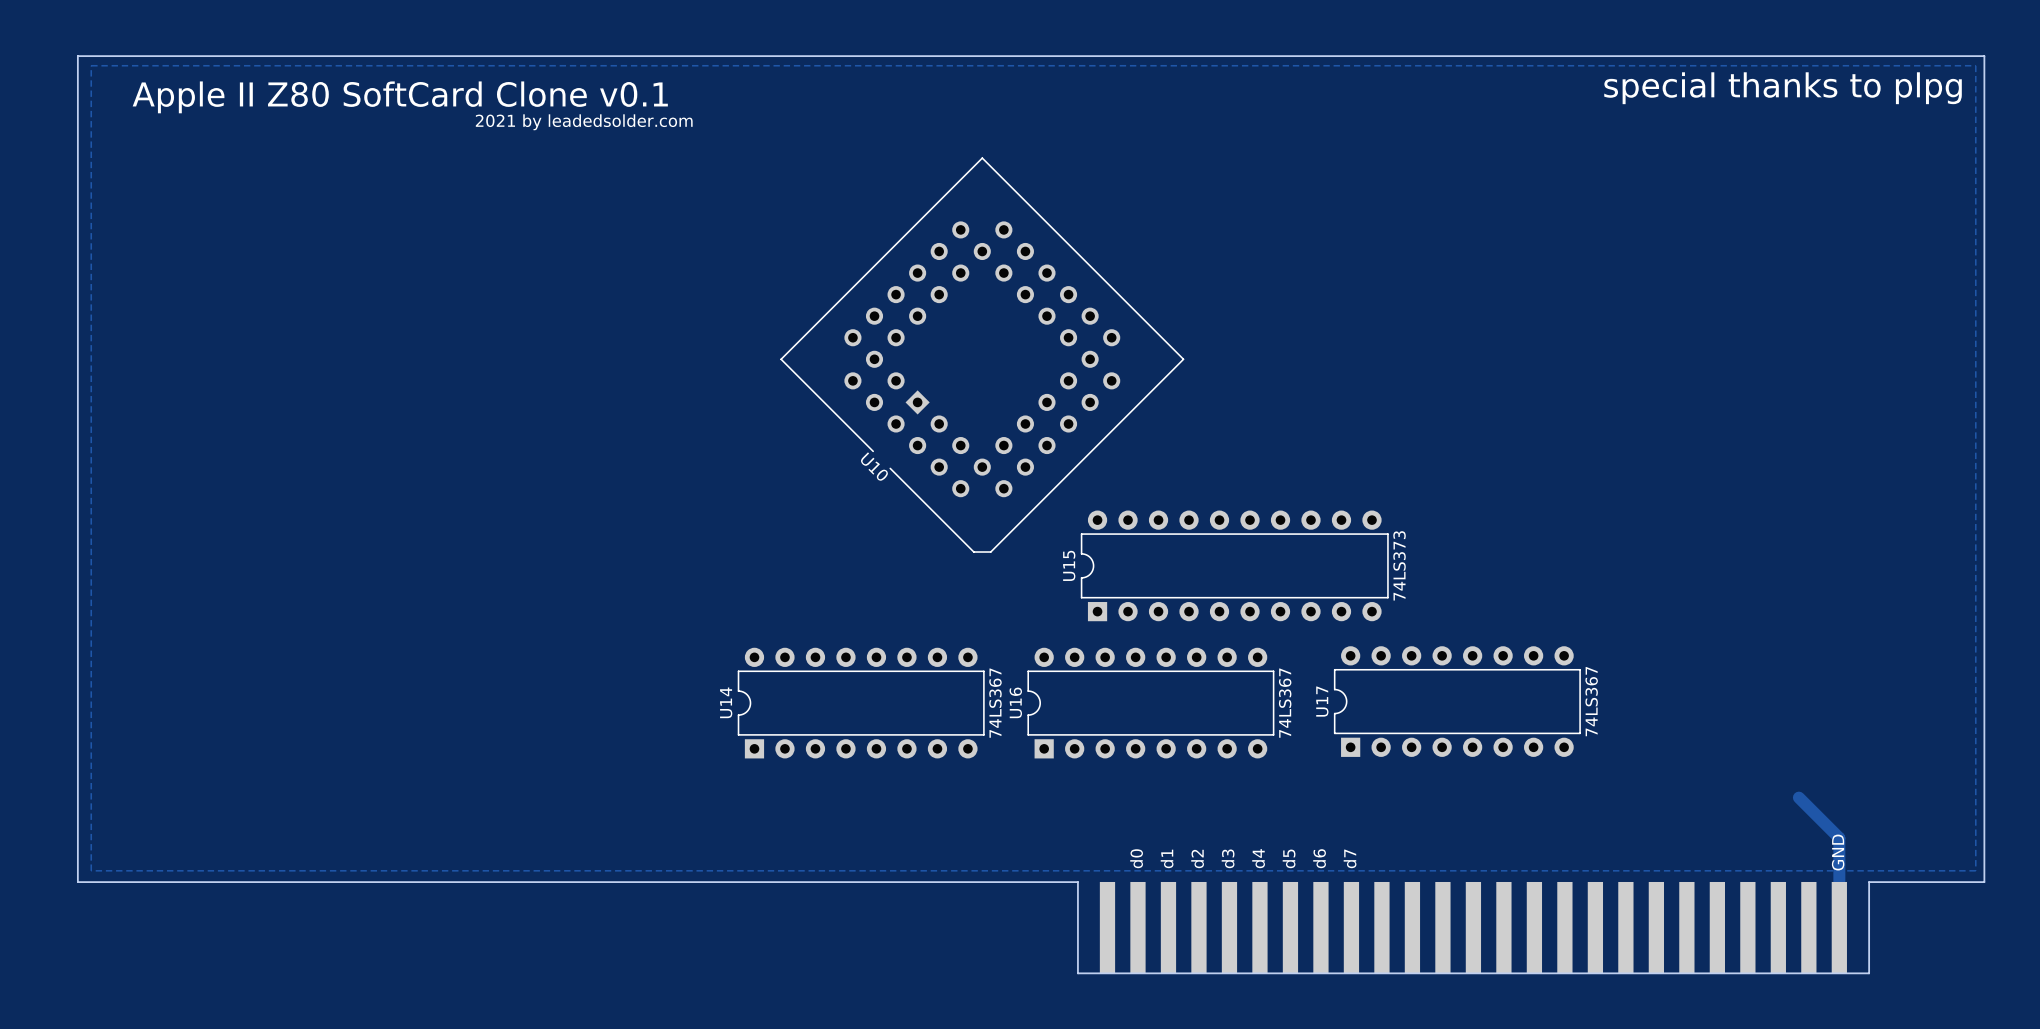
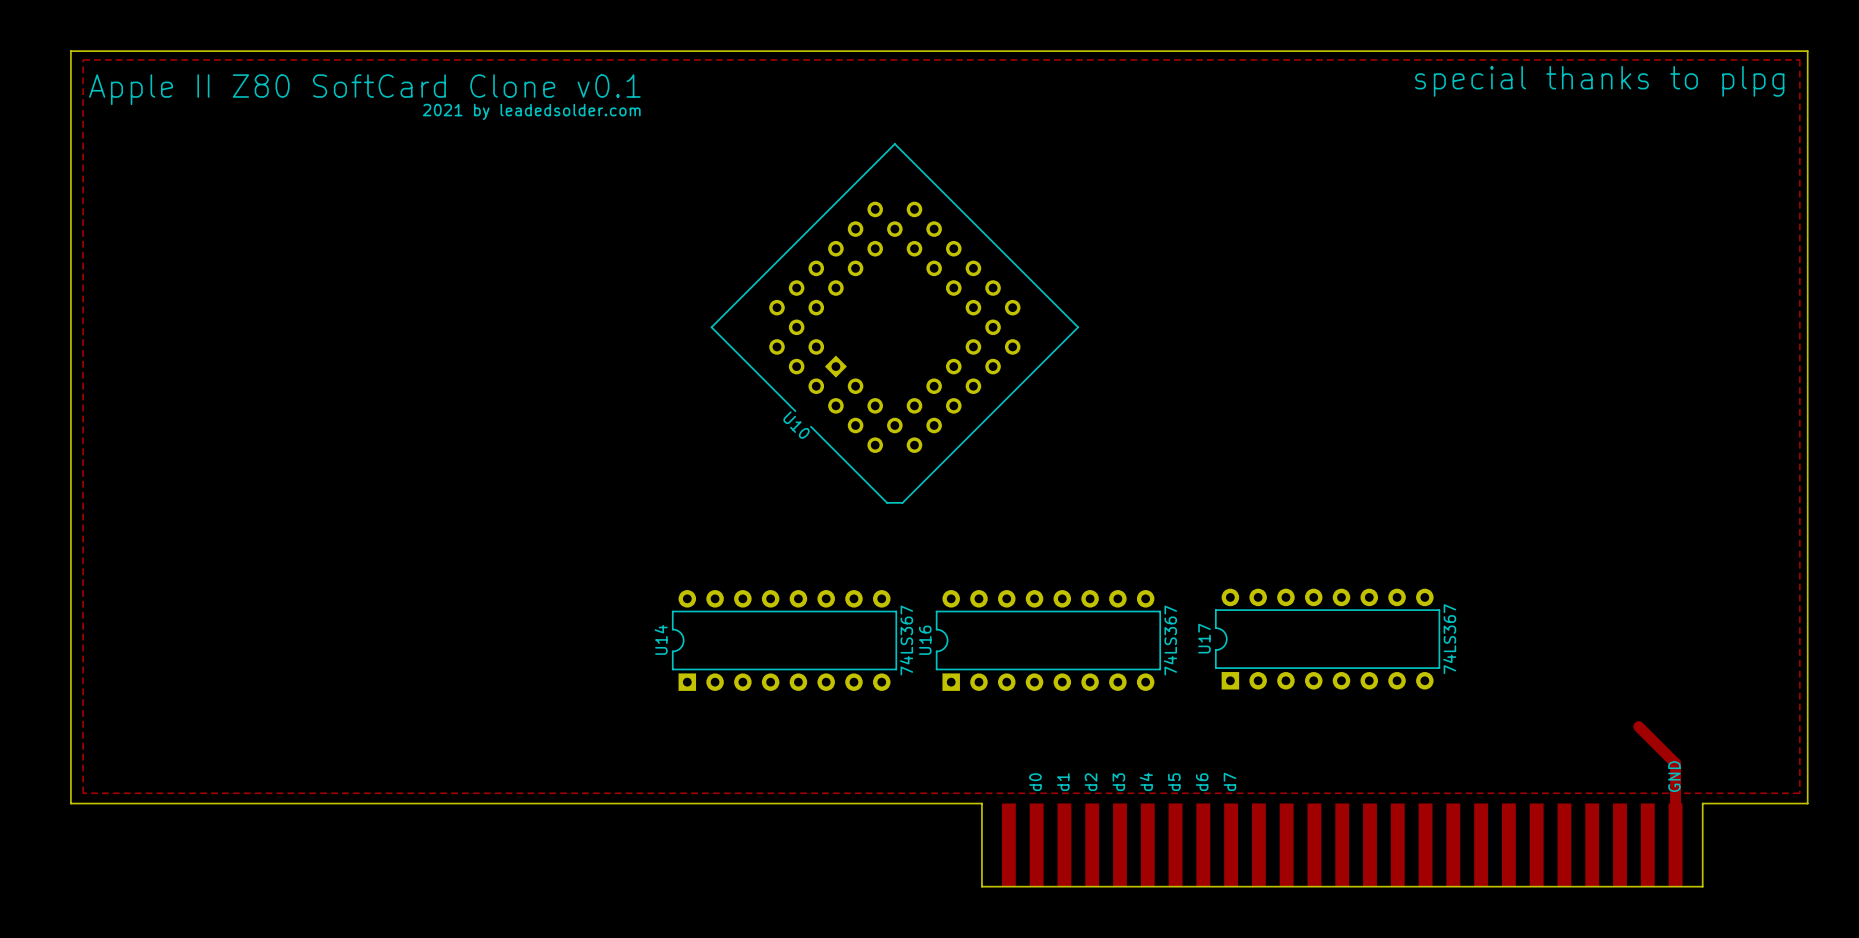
U15: 74LS373 (1234, 565) -> none

